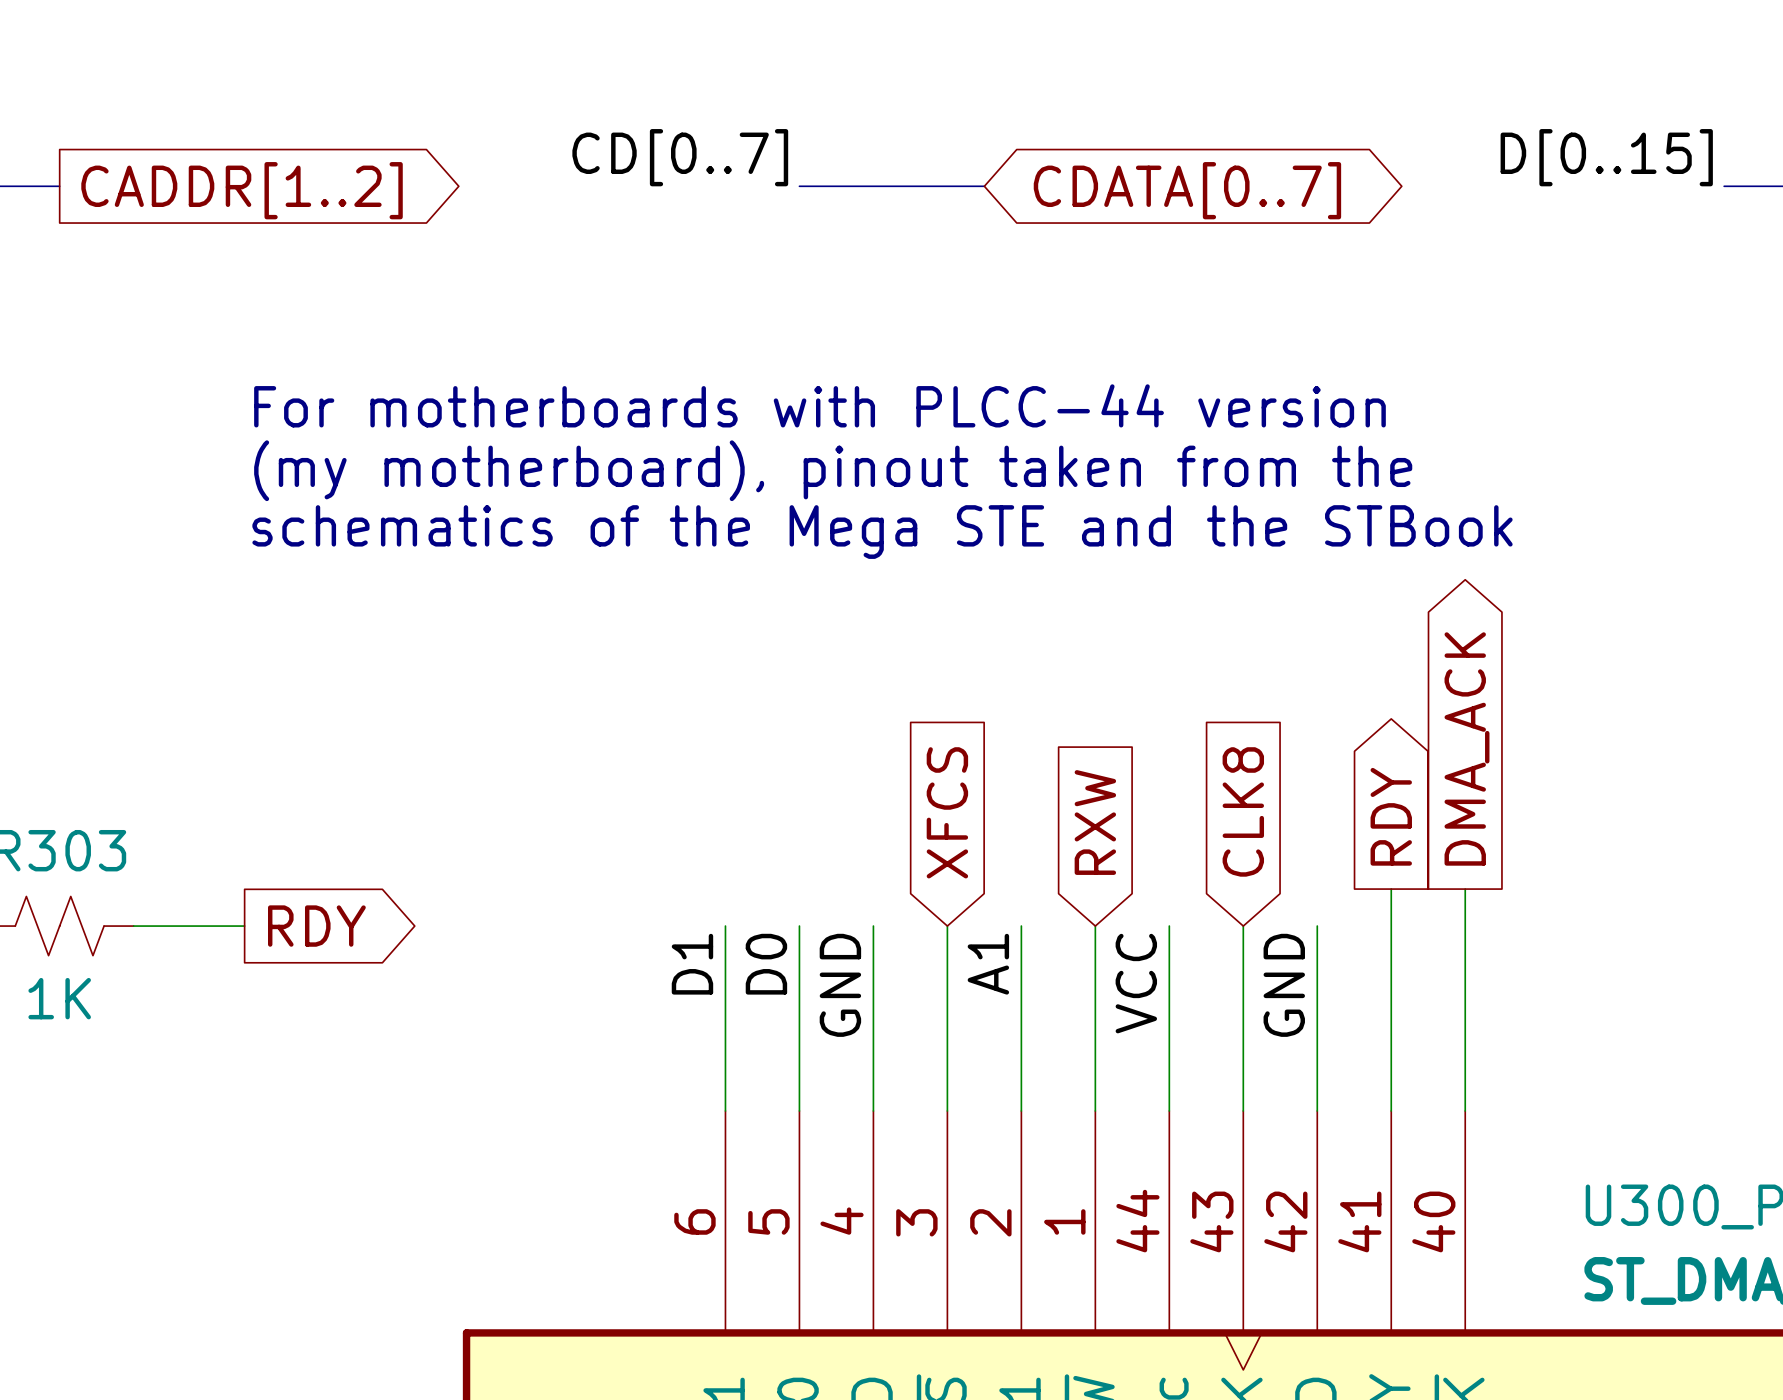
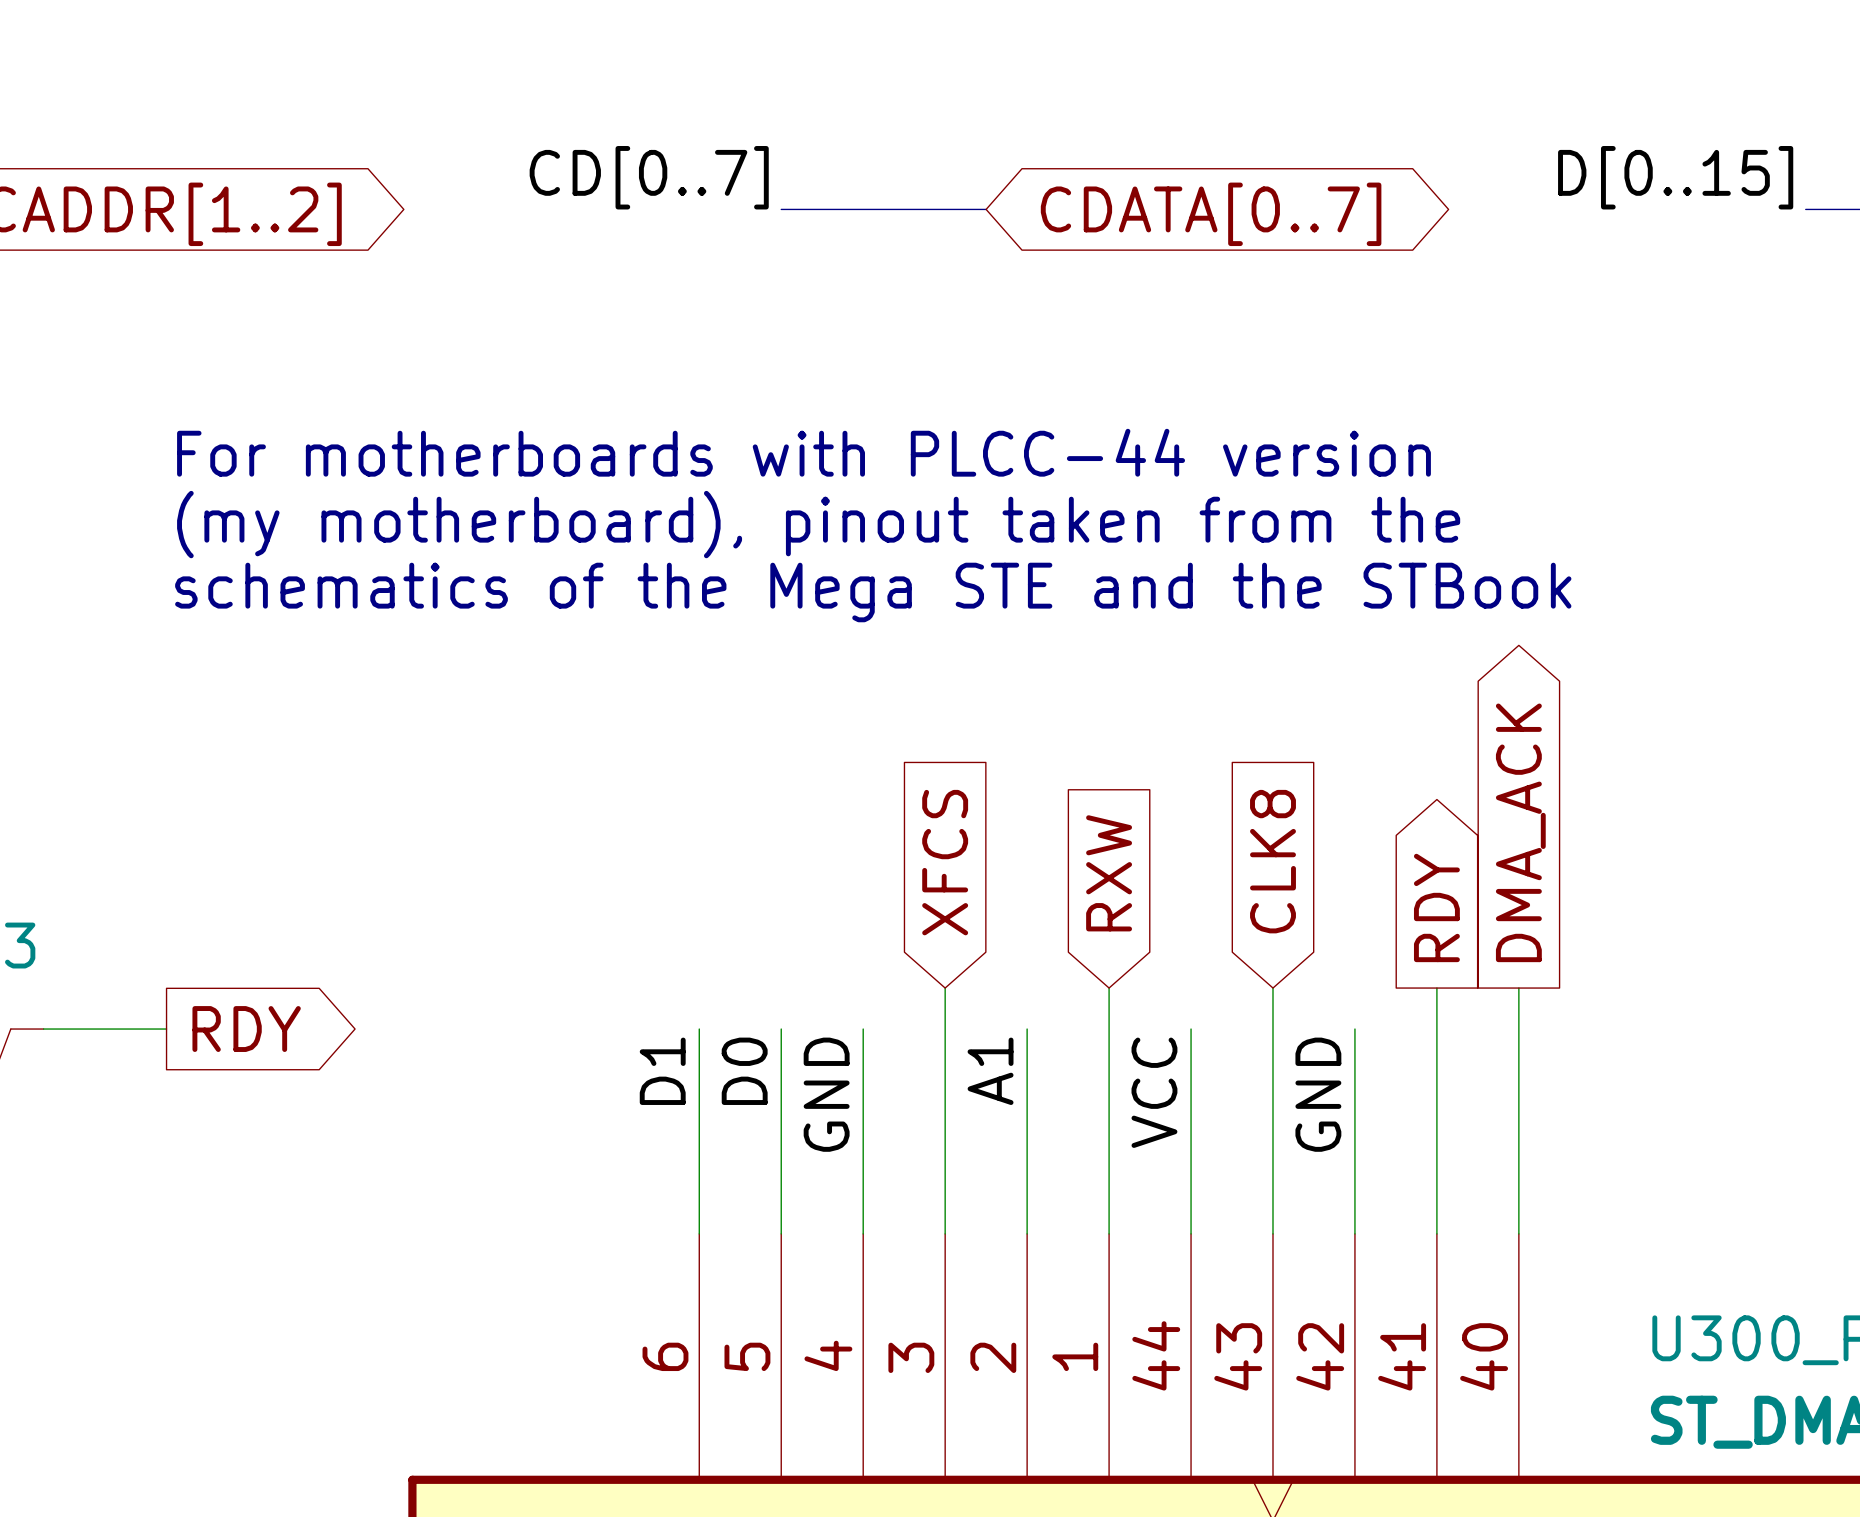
global label position: CLK8 (1243, 811) -> CLK8 (1272, 861)
global label position: XFCS (947, 812) -> XFCS (945, 862)
global label position: RXW (1095, 822) -> RXW (1109, 873)
wire: none -> (945, 988) (945, 1029)
wire: none -> (1109, 988) (1109, 1029)
wire: none -> (1272, 988) (1272, 1029)

